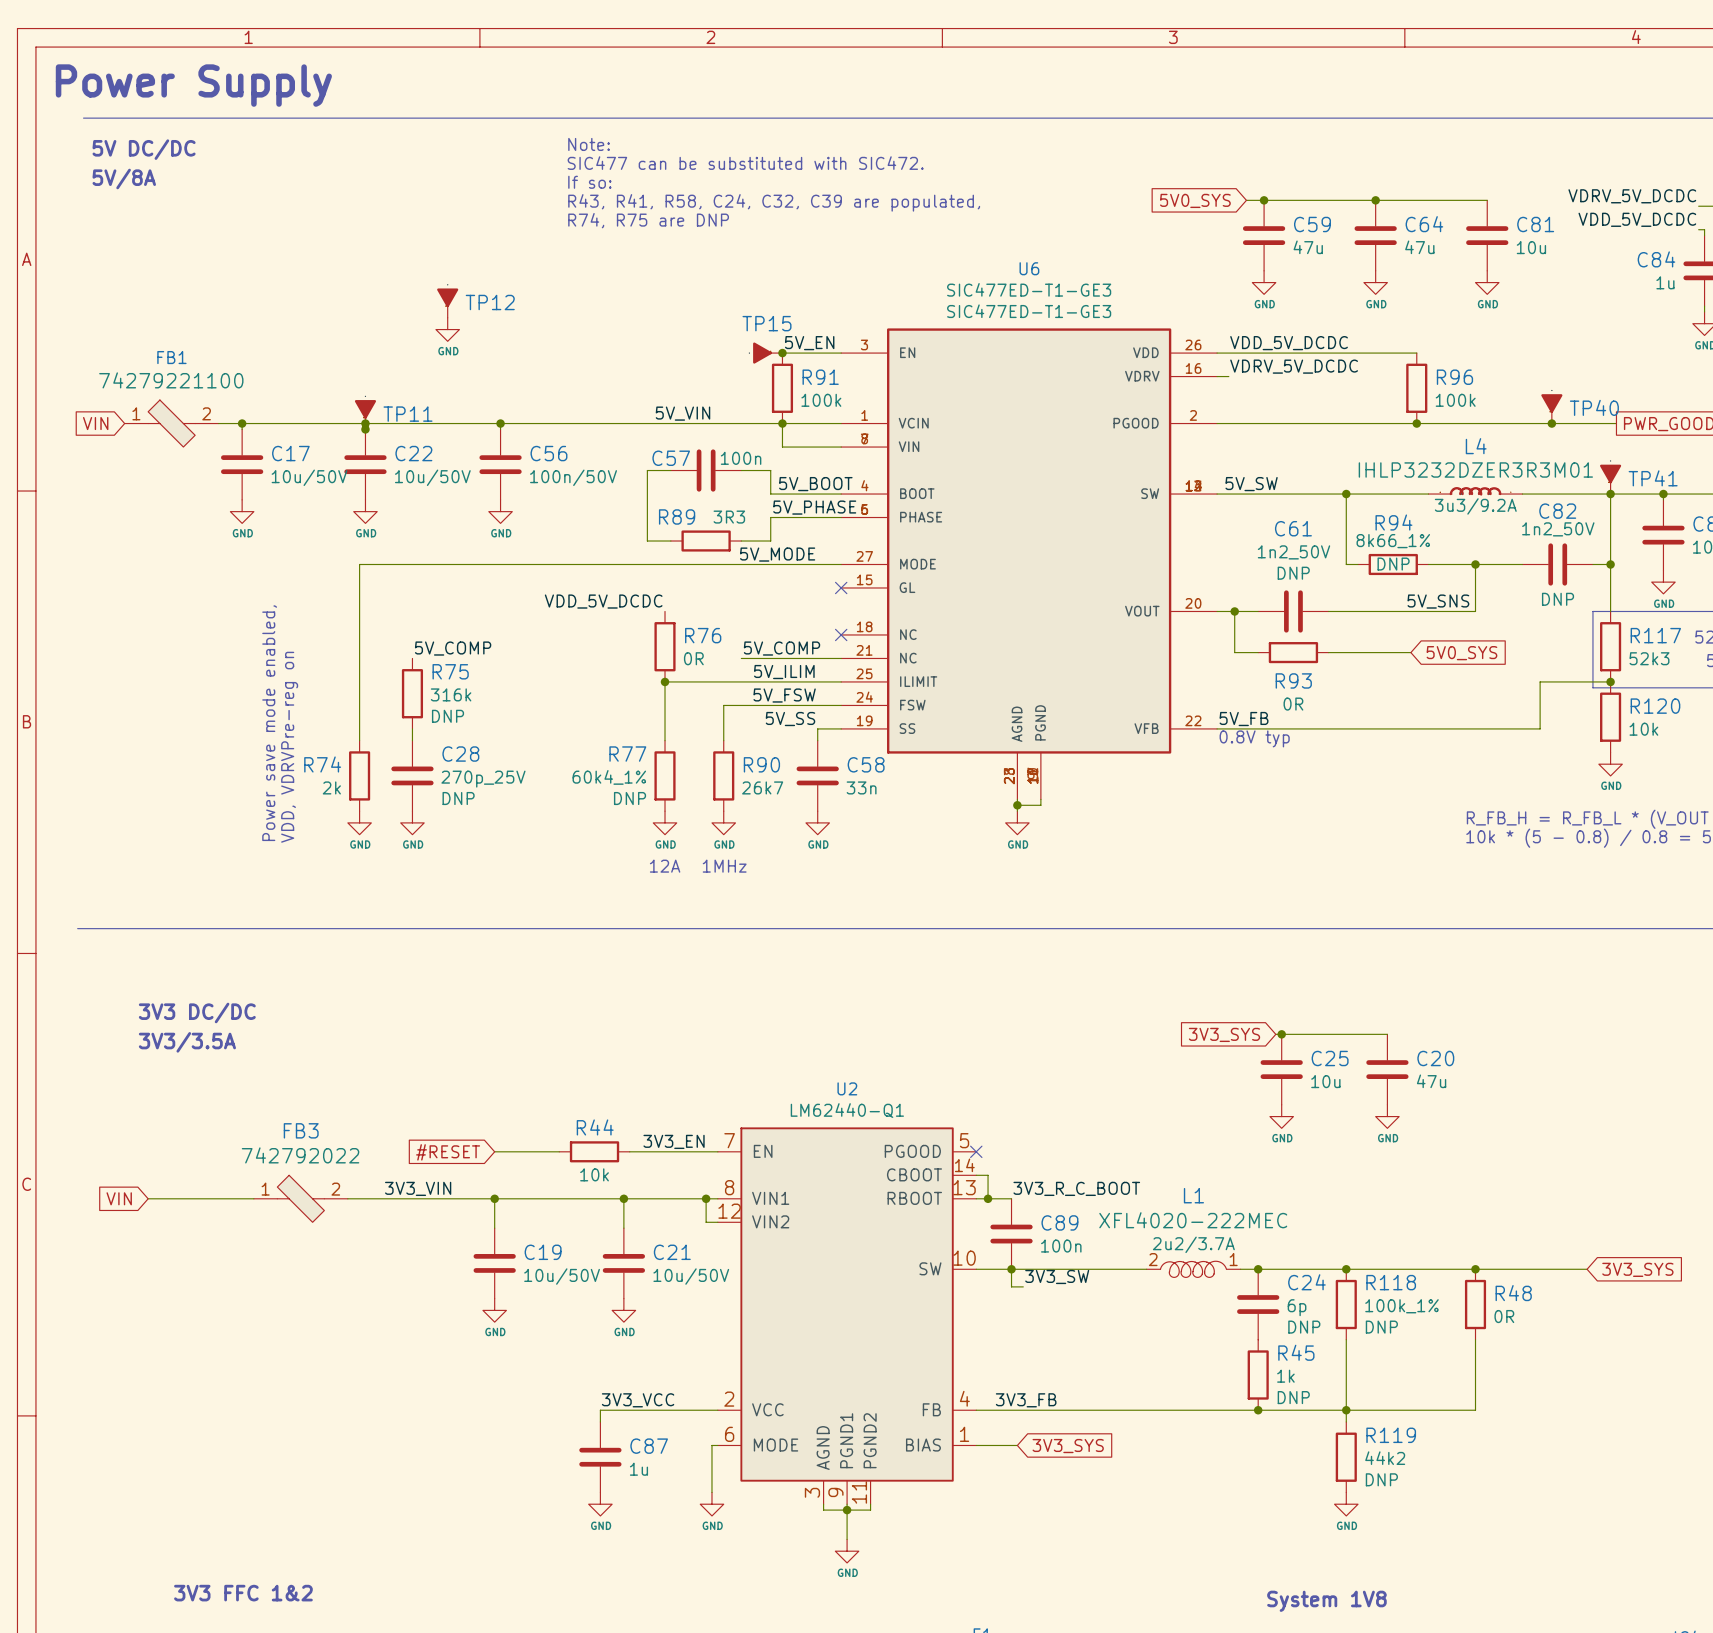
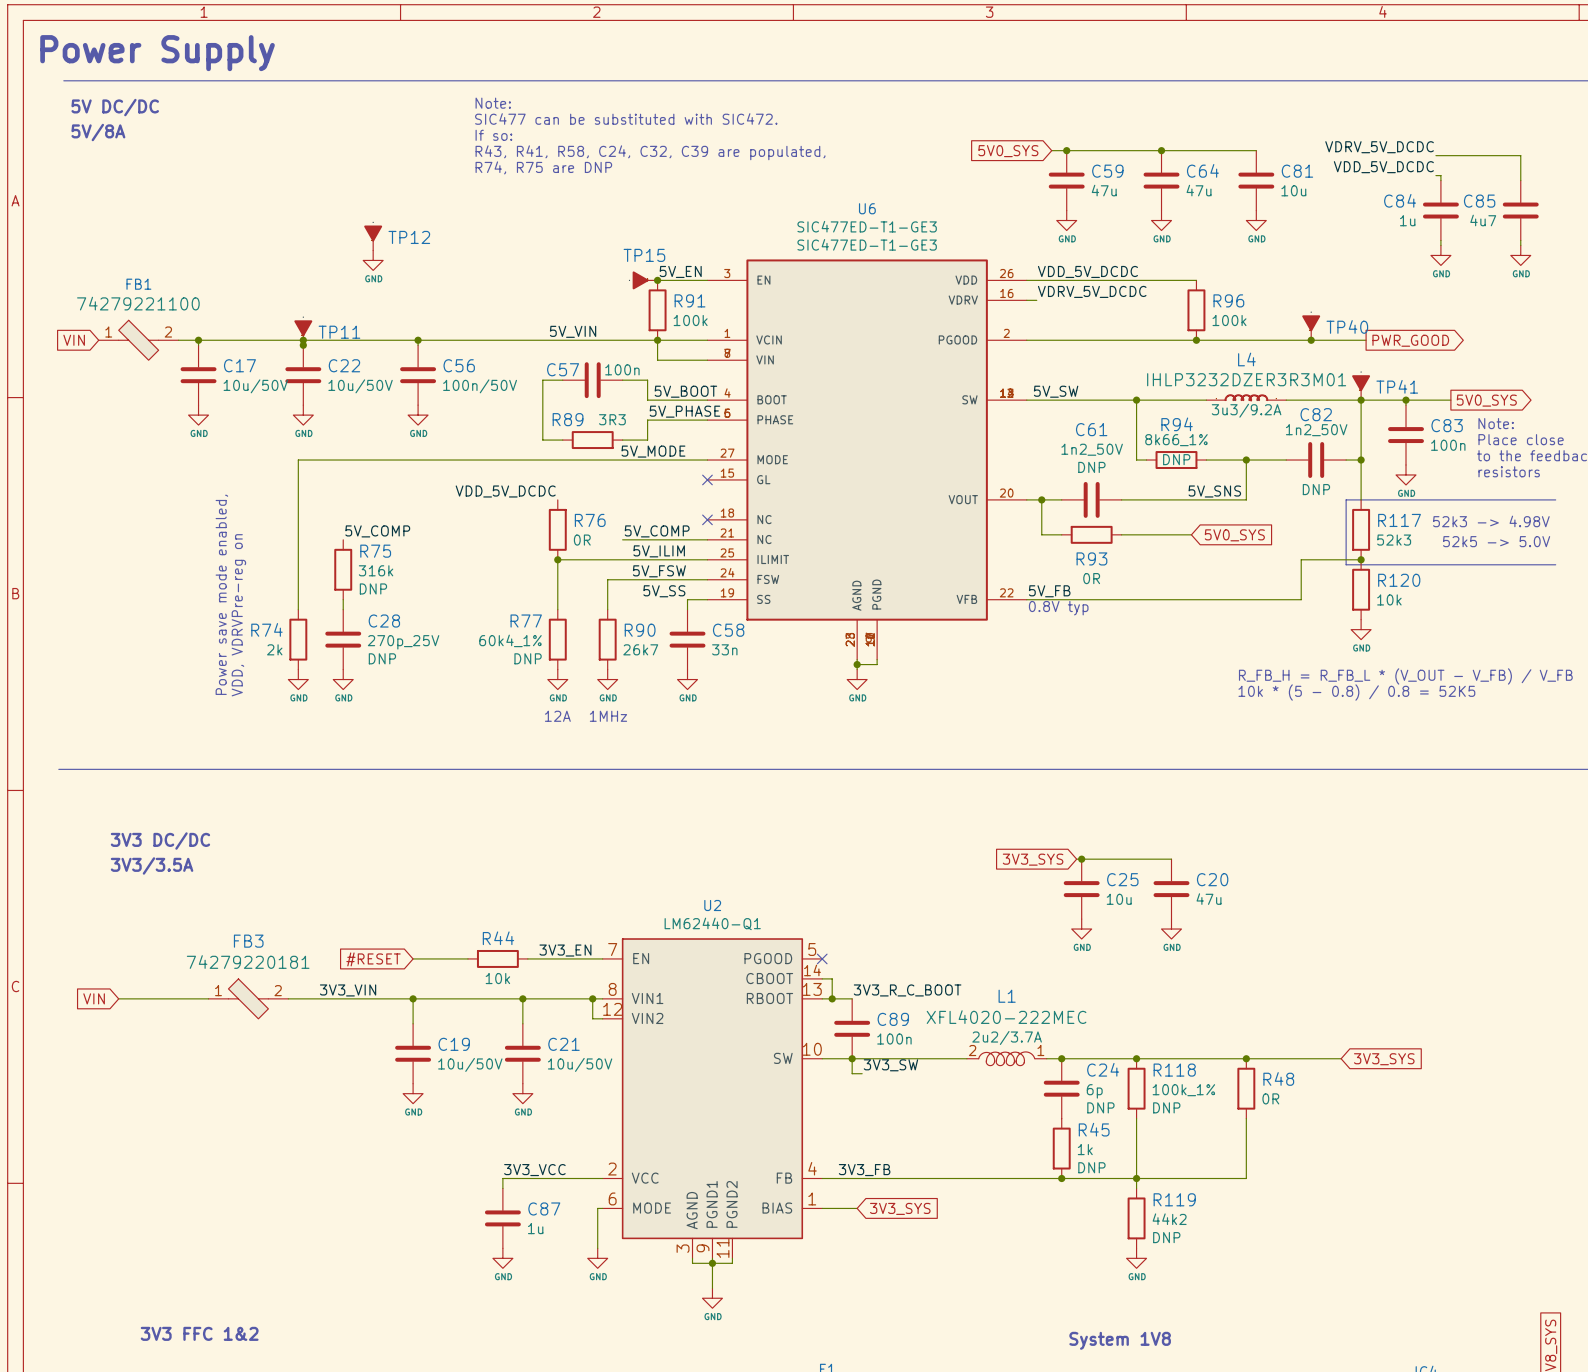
FB3 value: 742792022 (300, 1155) -> 74279220181 (248, 962)

